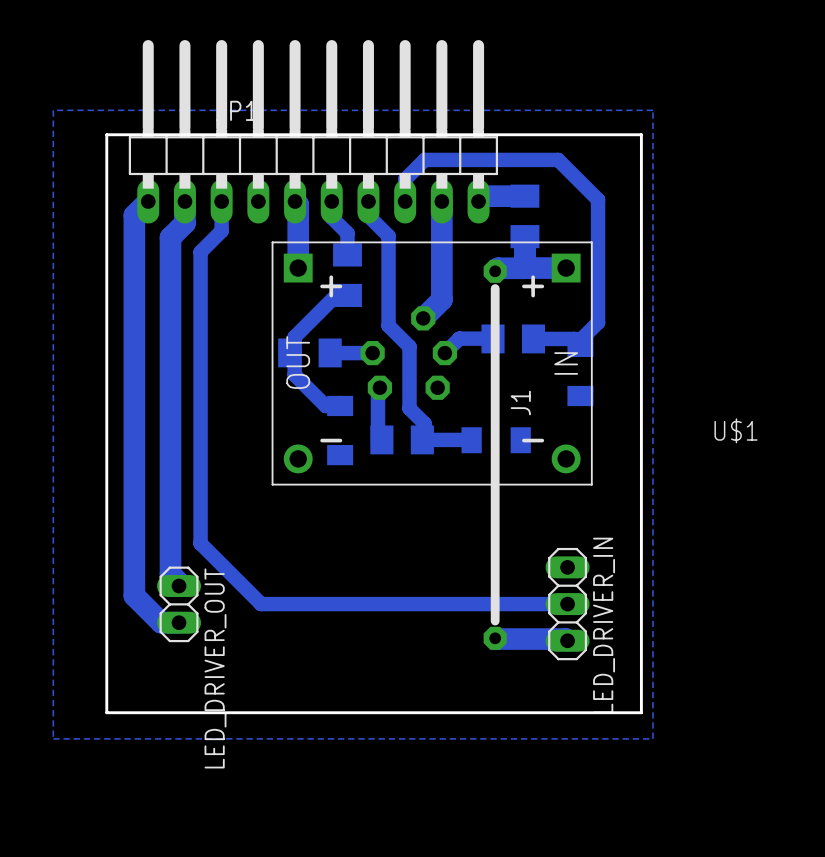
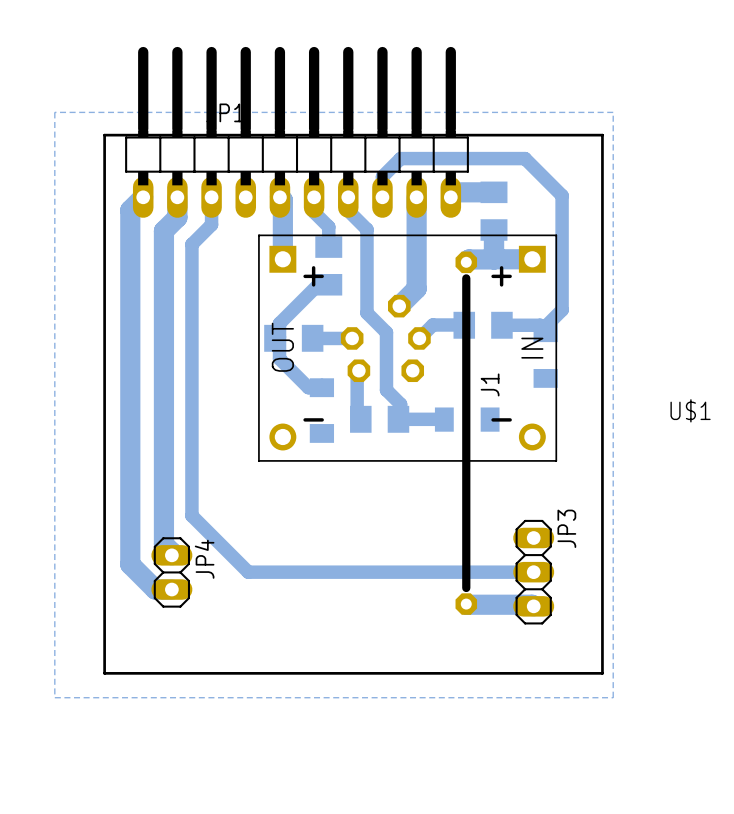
LED_DRIVER_IN name: LED_DRIVER_IN (604, 625) -> JP3 (566, 528)
LED_DRIVER_OUT name: LED_DRIVER_OUT (215, 668) -> JP4 (204, 559)

